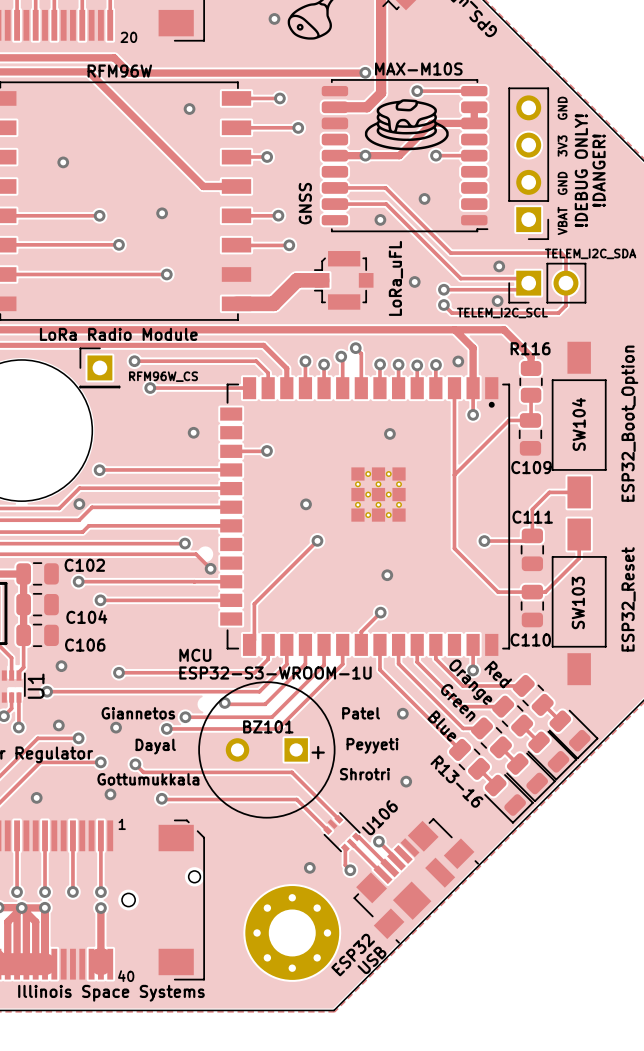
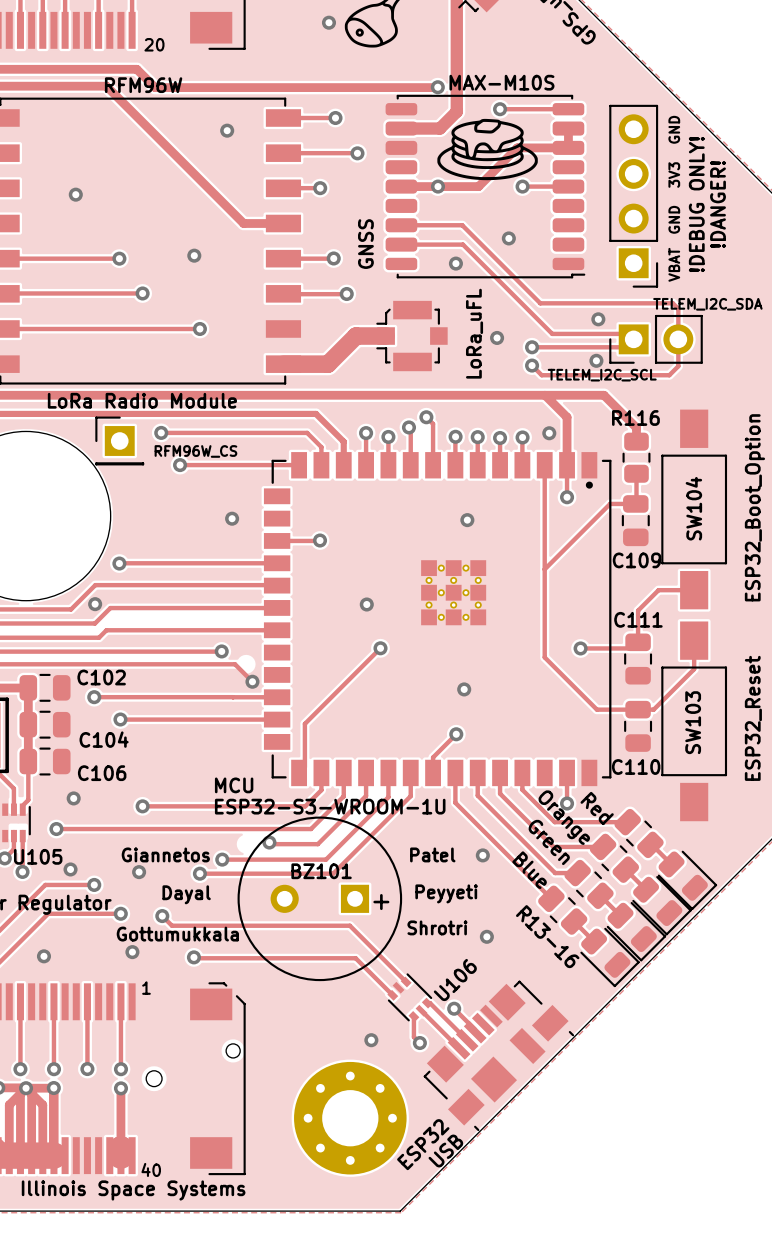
U1 name: U1 (36, 686) -> U105 (38, 856)

